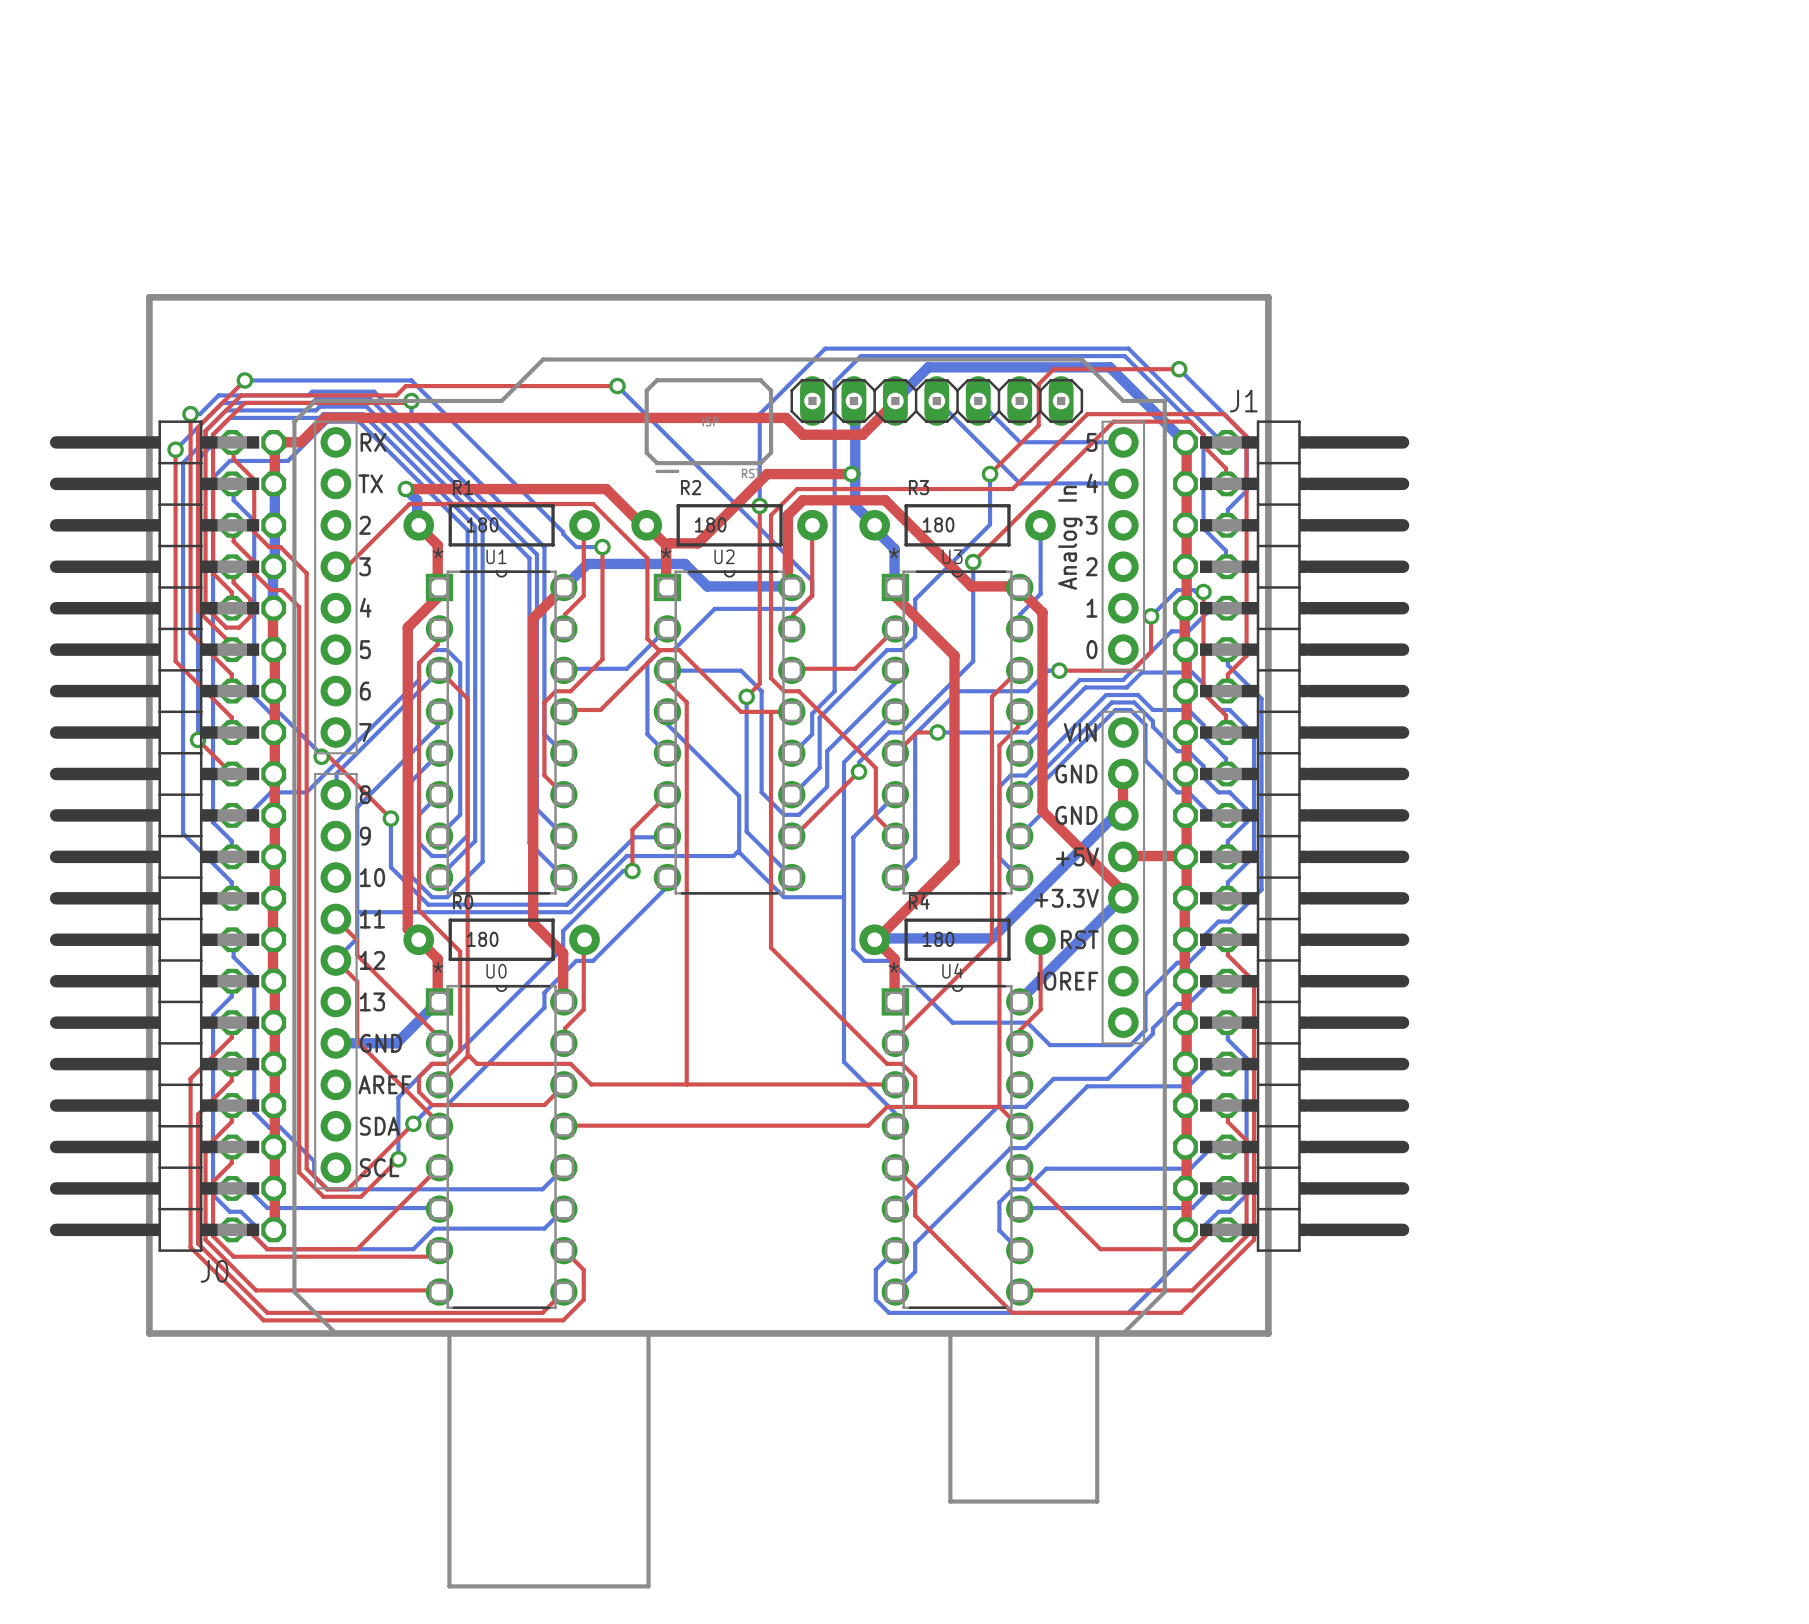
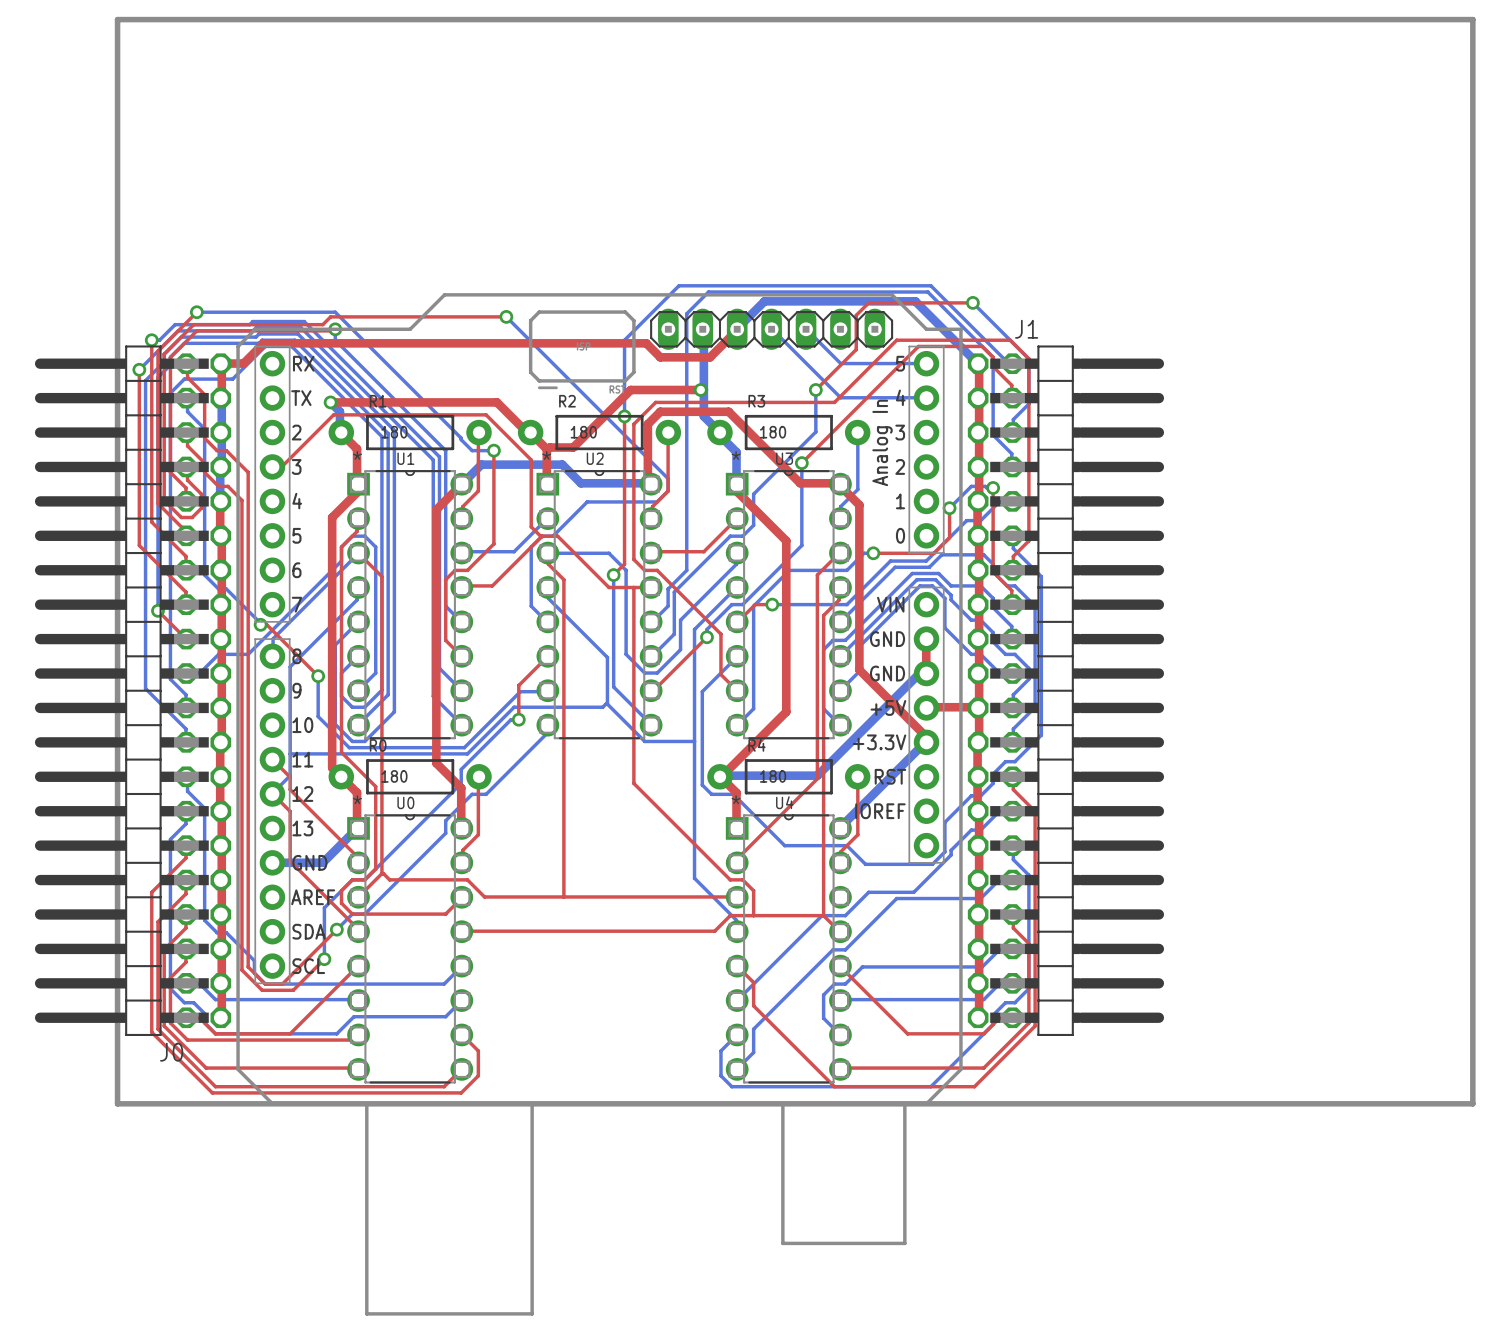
line: (149, 297) (1268, 297) (1268, 1333) -> (117, 243) (117, 19) (1472, 19) (1472, 1103) (1047, 1103)

